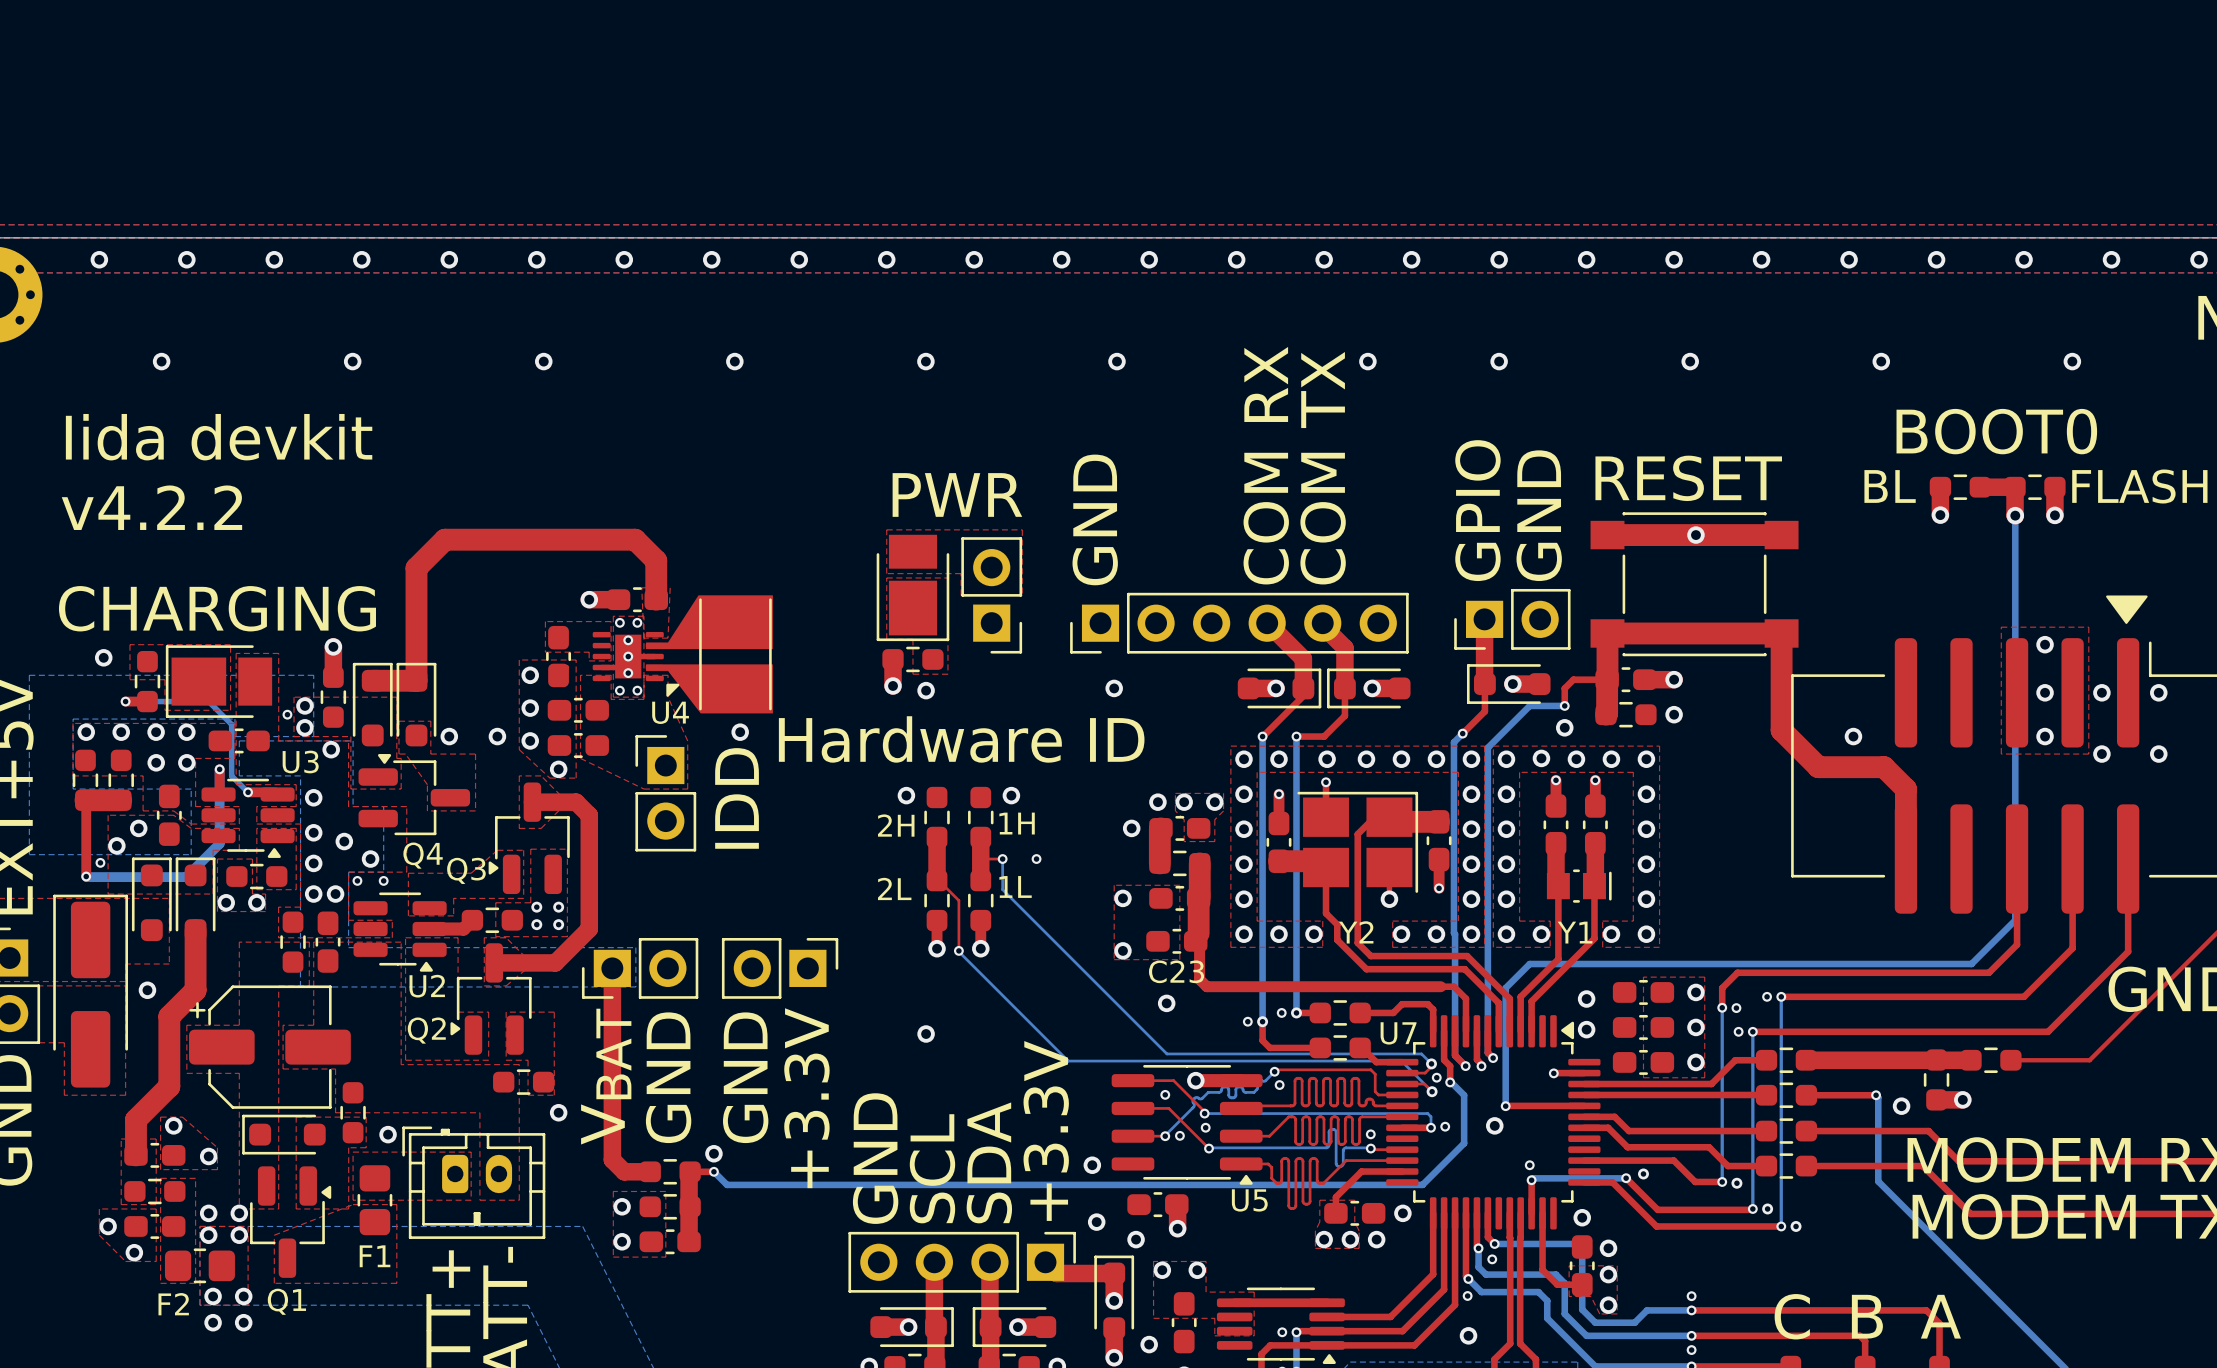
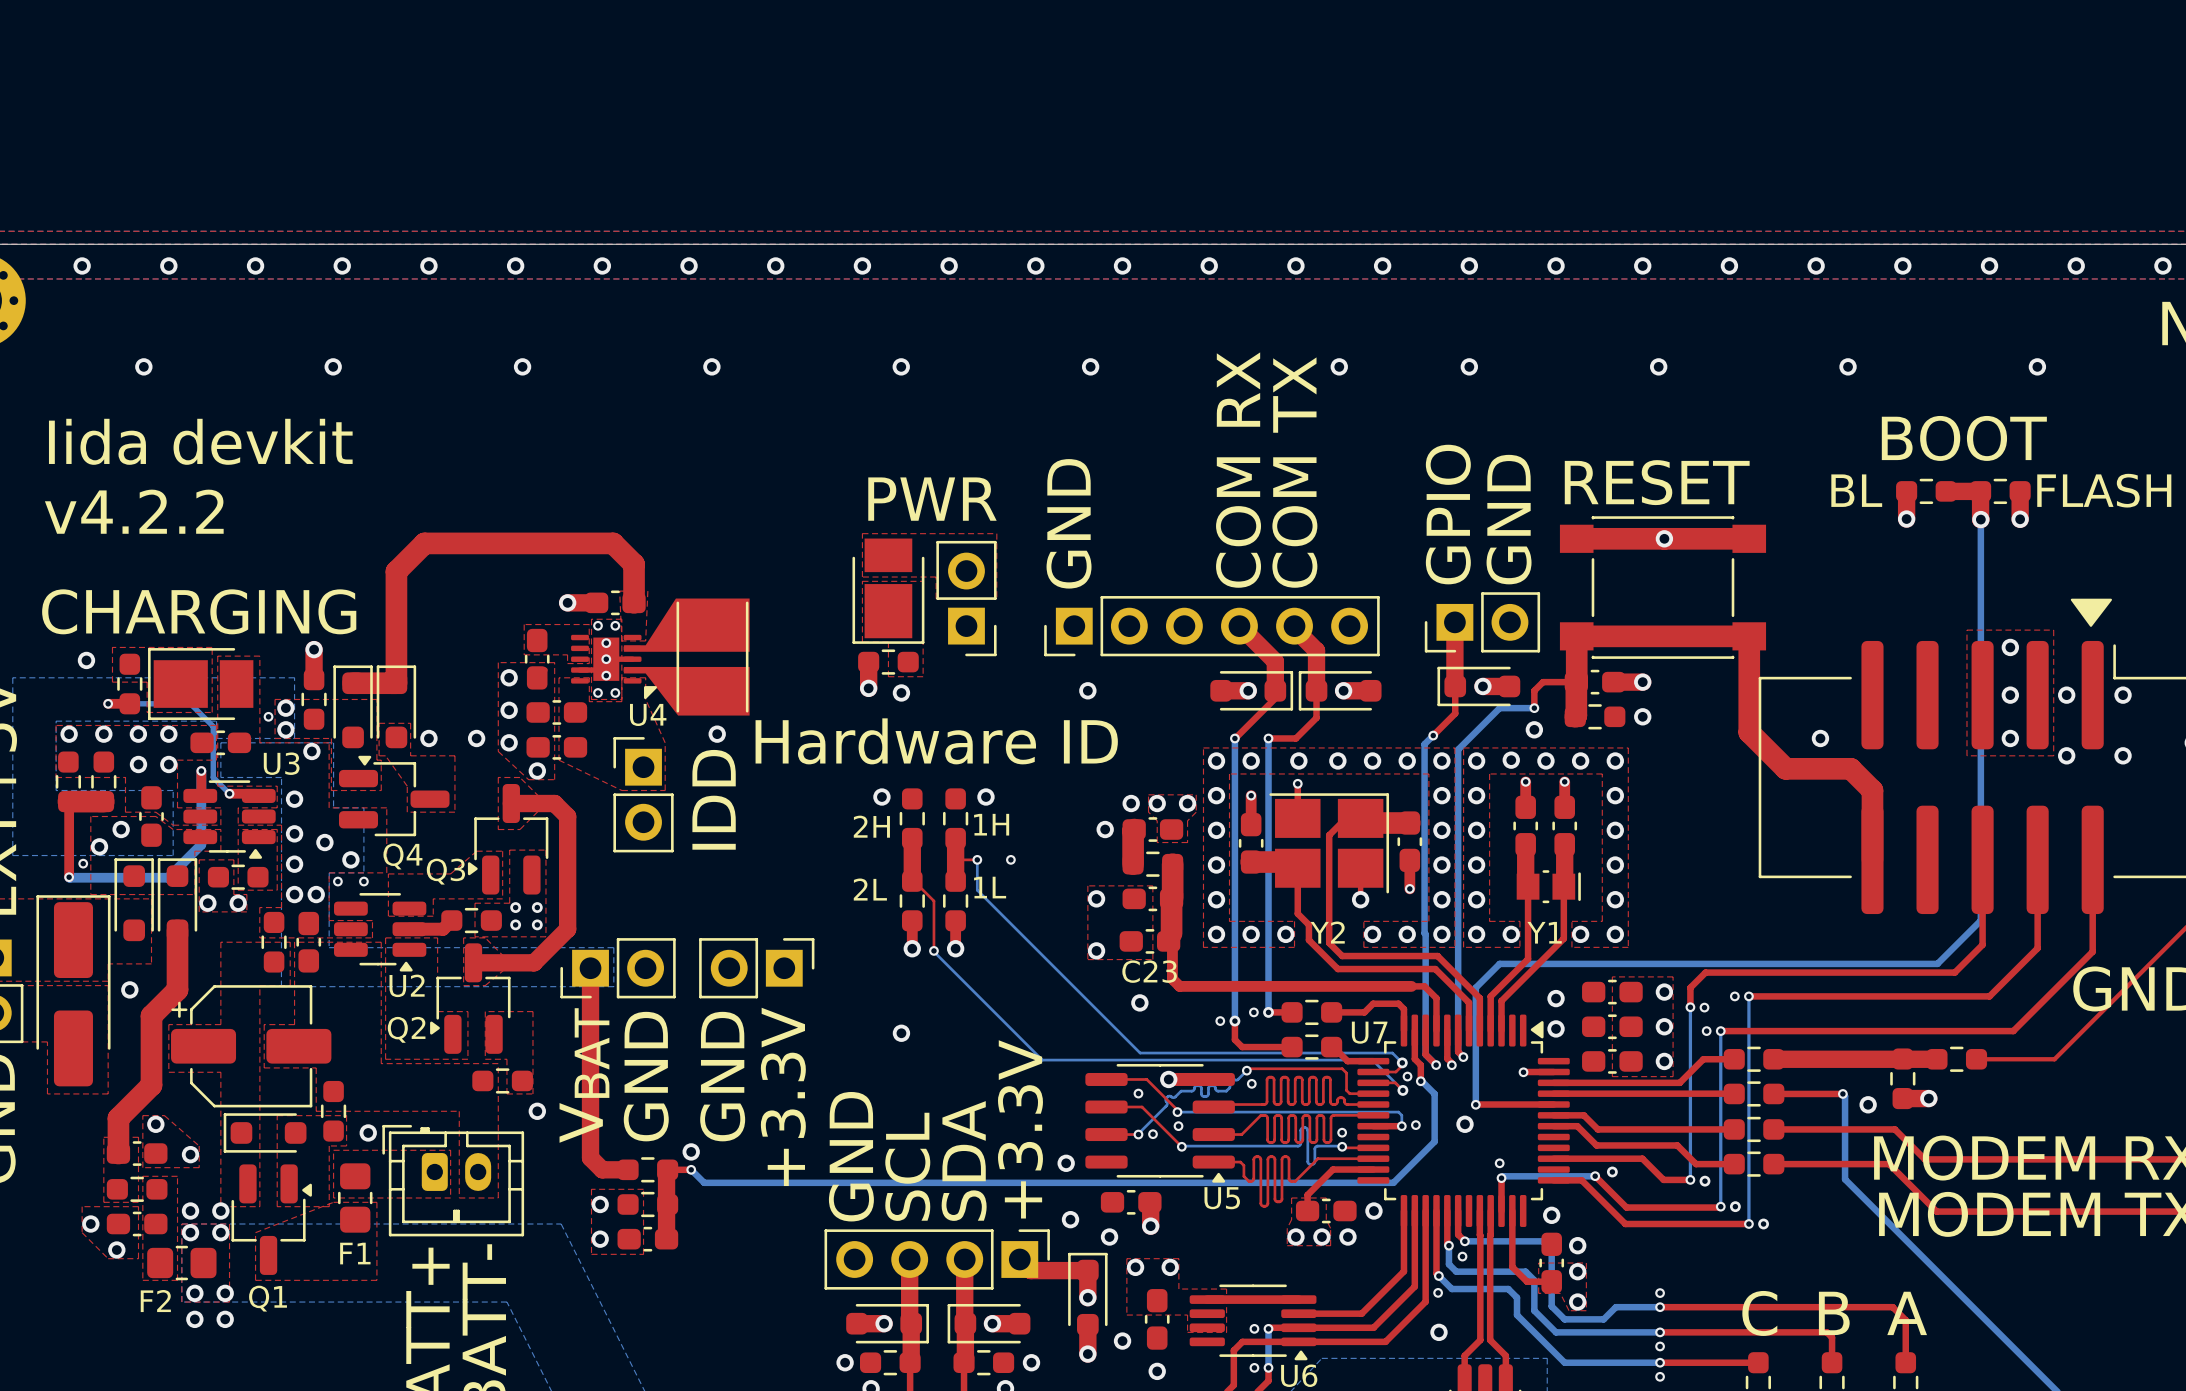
text: BOOT0 (1996, 431) -> BOOT (1964, 438)

